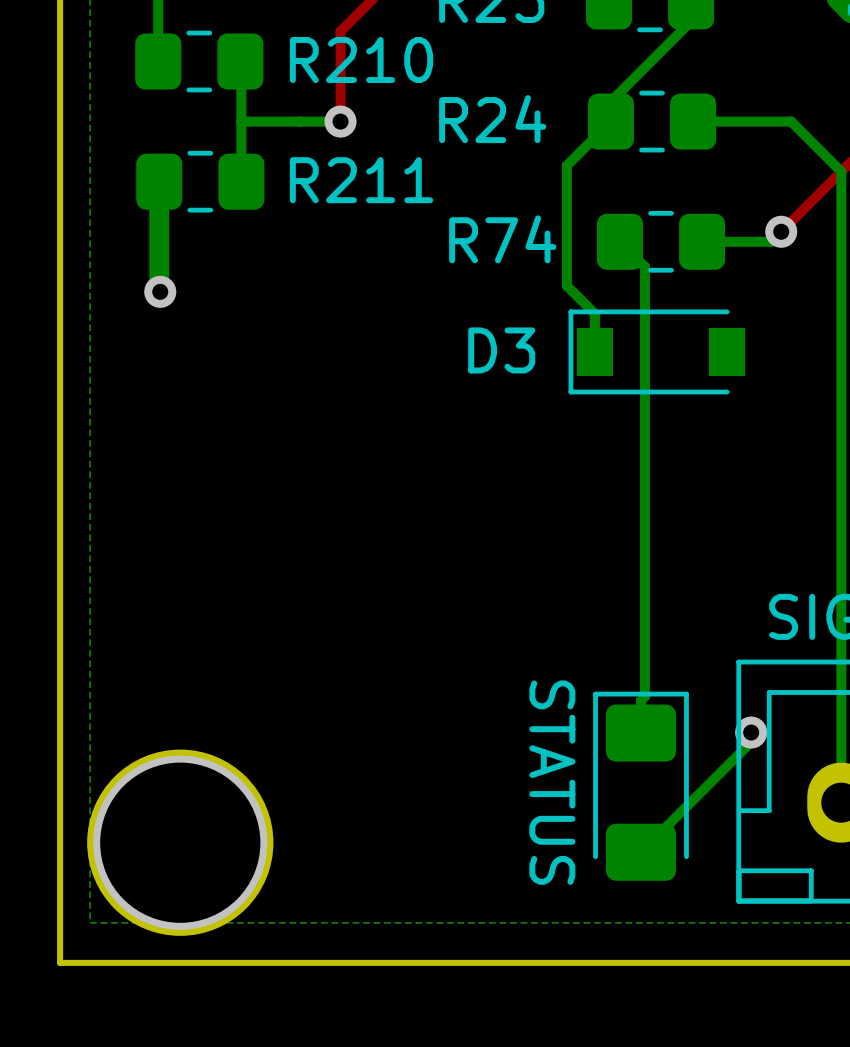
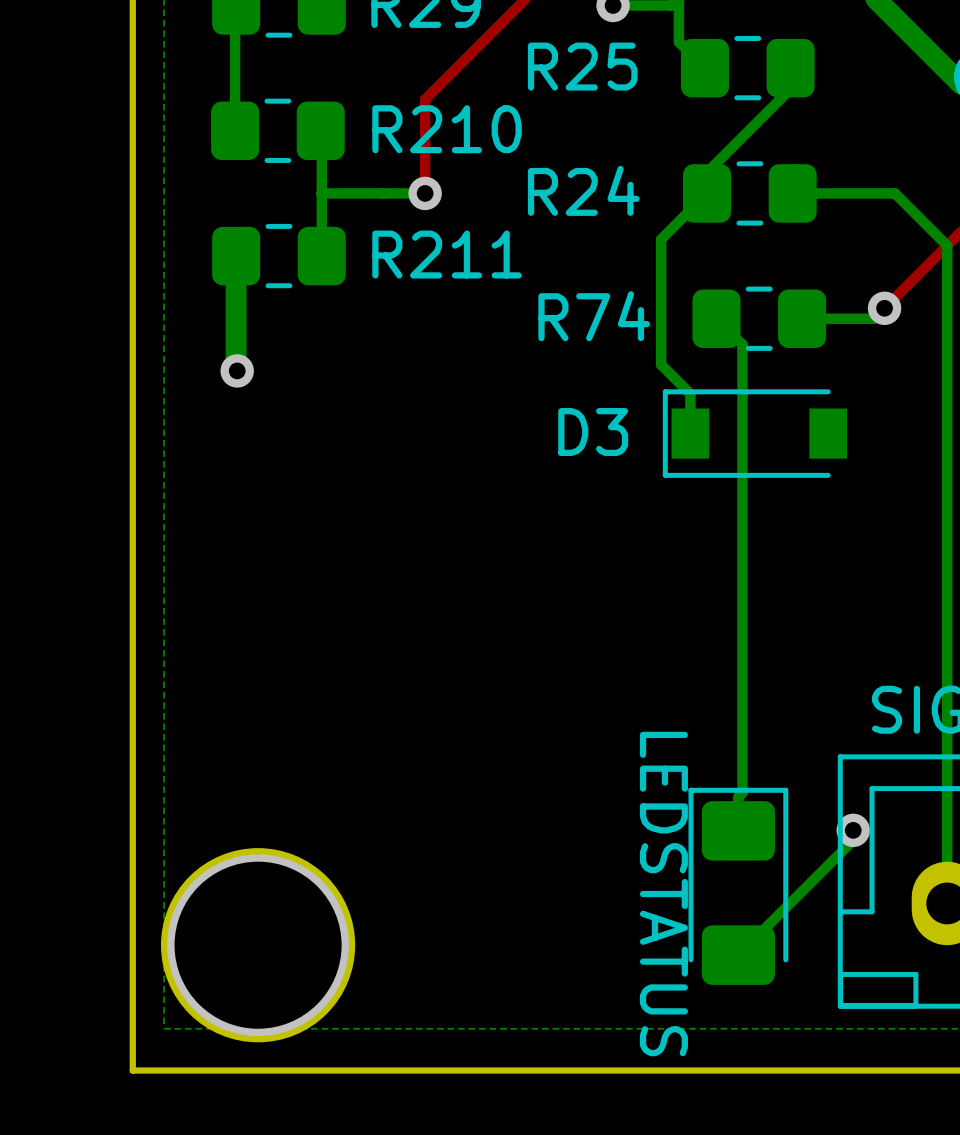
part value: STATUS (552, 782) -> LEDSTATUS (663, 894)

